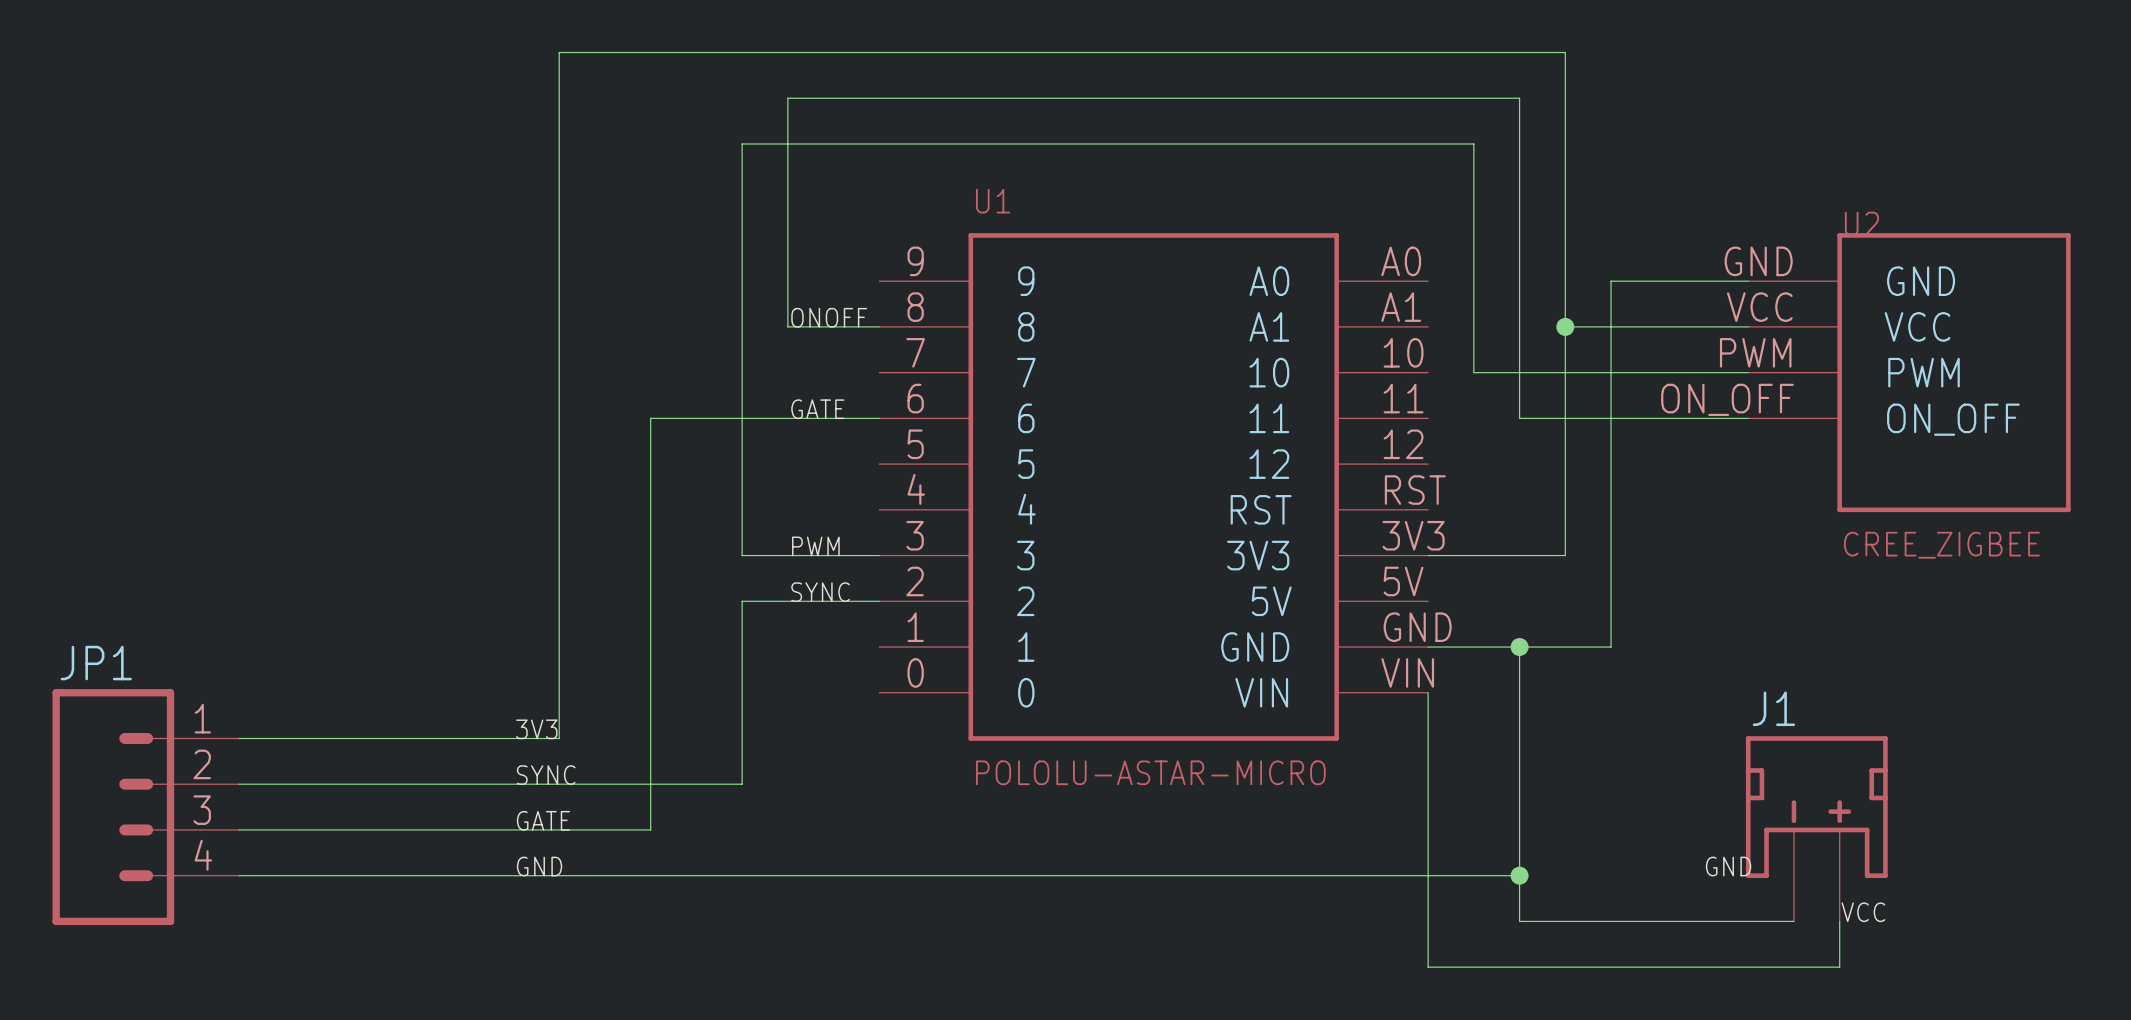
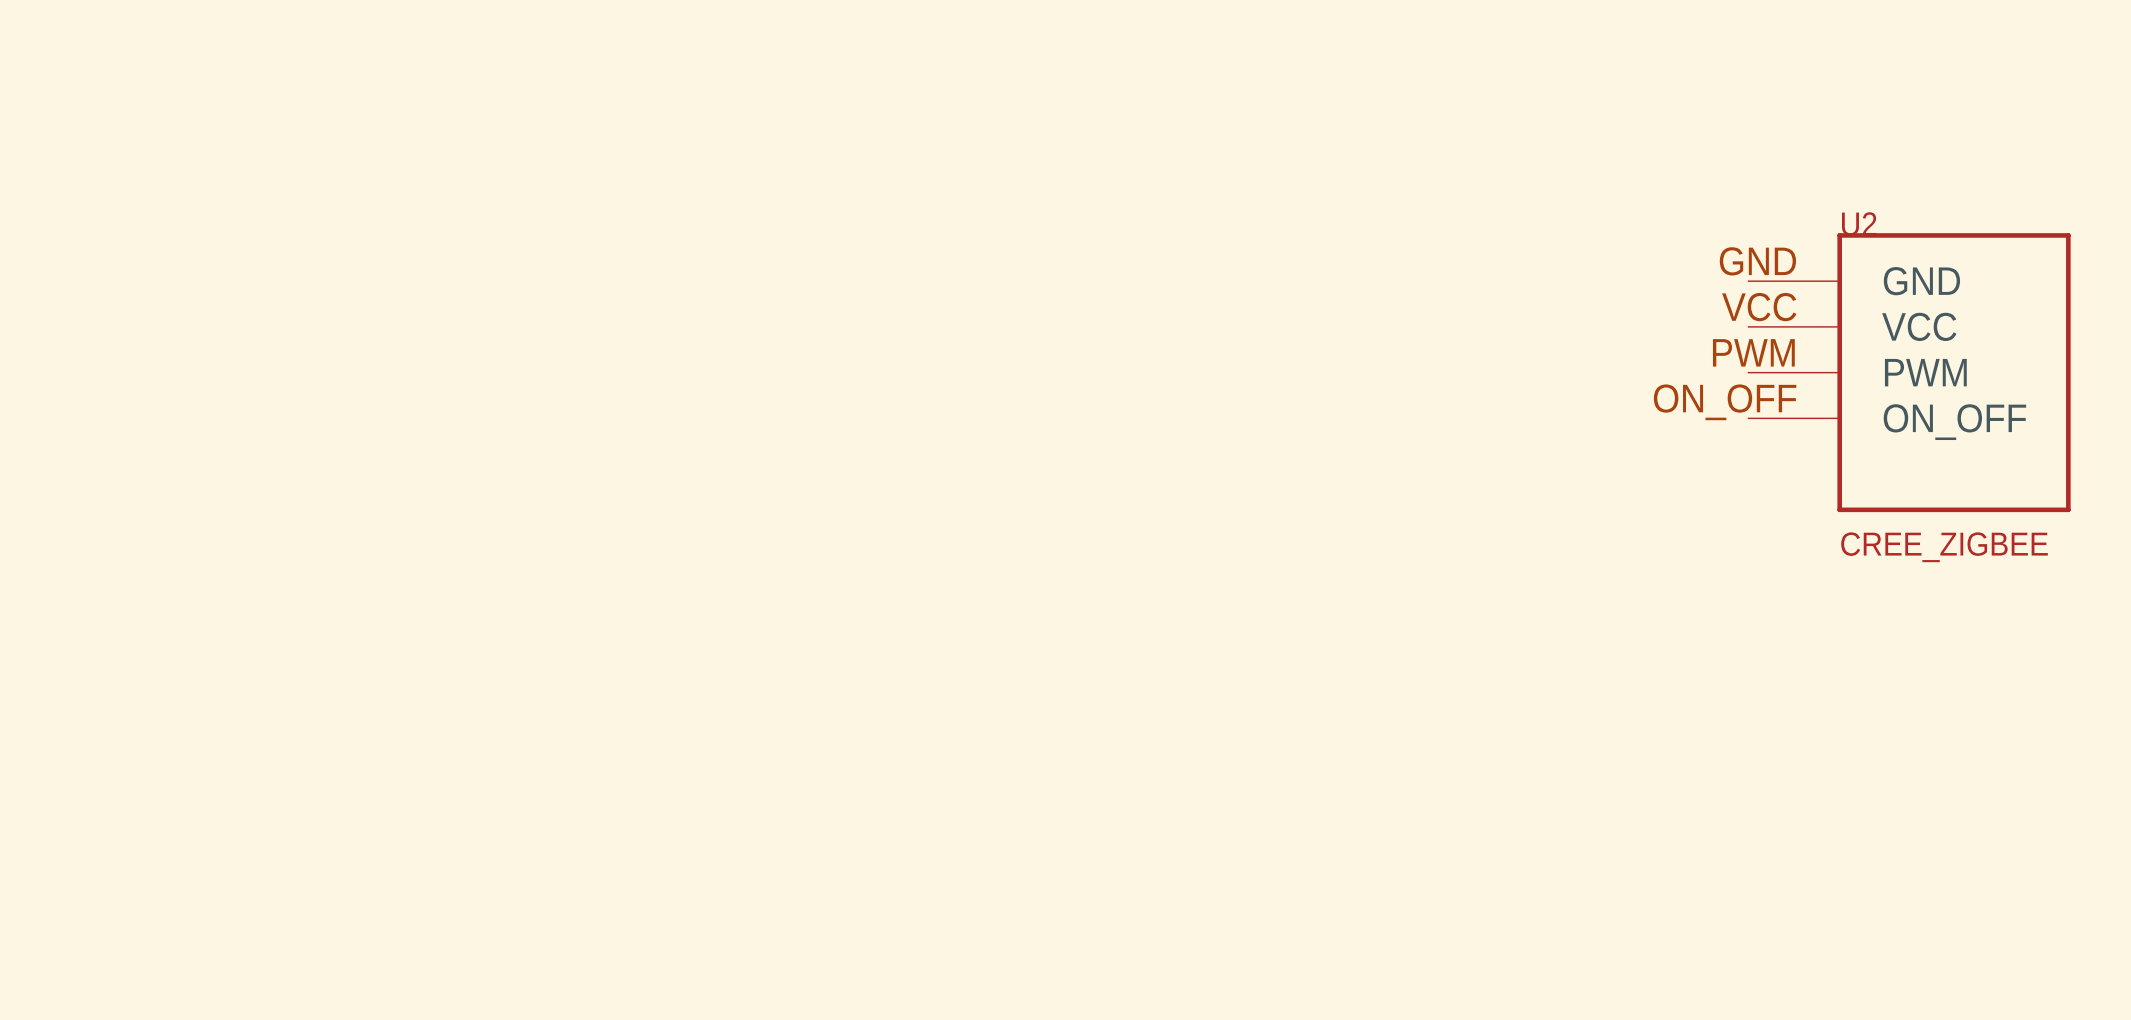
wire: (1748, 281) (1611, 281) (1611, 647) (1428, 647) -> none
label: ONOFF (829, 317) -> none
wire: (879, 326) (787, 326) (787, 98) (1519, 98) (1519, 418) (1748, 418) -> none
wire: (1565, 326) (1748, 326) -> none
junction: (1565, 326) -> none
wire: (1748, 372) (1473, 372) (1473, 143) (742, 143) (742, 555) (879, 555) -> none
label: GATE (817, 409) -> none
wire: (879, 418) (650, 418) (650, 829) (239, 829) -> none
U1: POLOLU-ASTAR-MICRO (1153, 486) -> none
label: PWM (815, 546) -> none
wire: (1428, 555) (1565, 555) (1565, 52) (559, 52) (559, 738) (239, 738) -> none
label: SYNC (820, 592) -> none
wire: (879, 601) (742, 601) (742, 784) (239, 784) -> none
wire: (1519, 647) (1519, 921) (1793, 921) -> none
junction: (1519, 647) -> none
wire: (1428, 692) (1428, 967) (1839, 967) (1839, 921) -> none
label: 3V3 (536, 729) -> none
label: SYNC (546, 775) -> none
JP1: (145, 807) -> none
label: GATE (543, 820) -> none
J1: (1816, 828) -> none
label: GND (539, 866) -> none
label: GND (1728, 866) -> none
wire: (239, 875) (1519, 875) -> none
junction: (1519, 875) -> none
label: VCC (1863, 912) -> none

